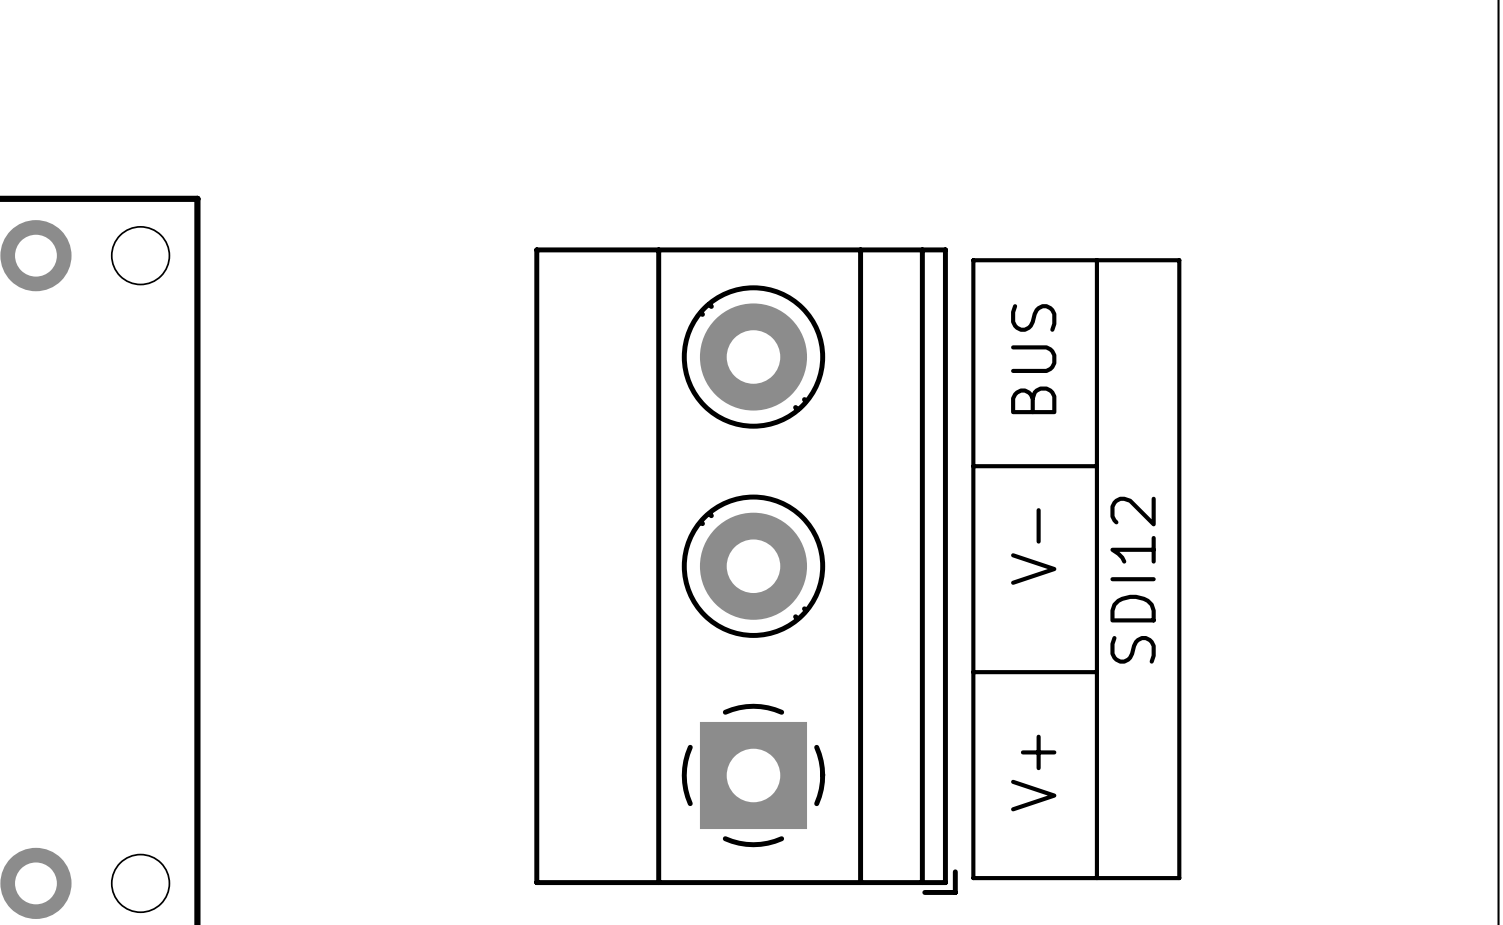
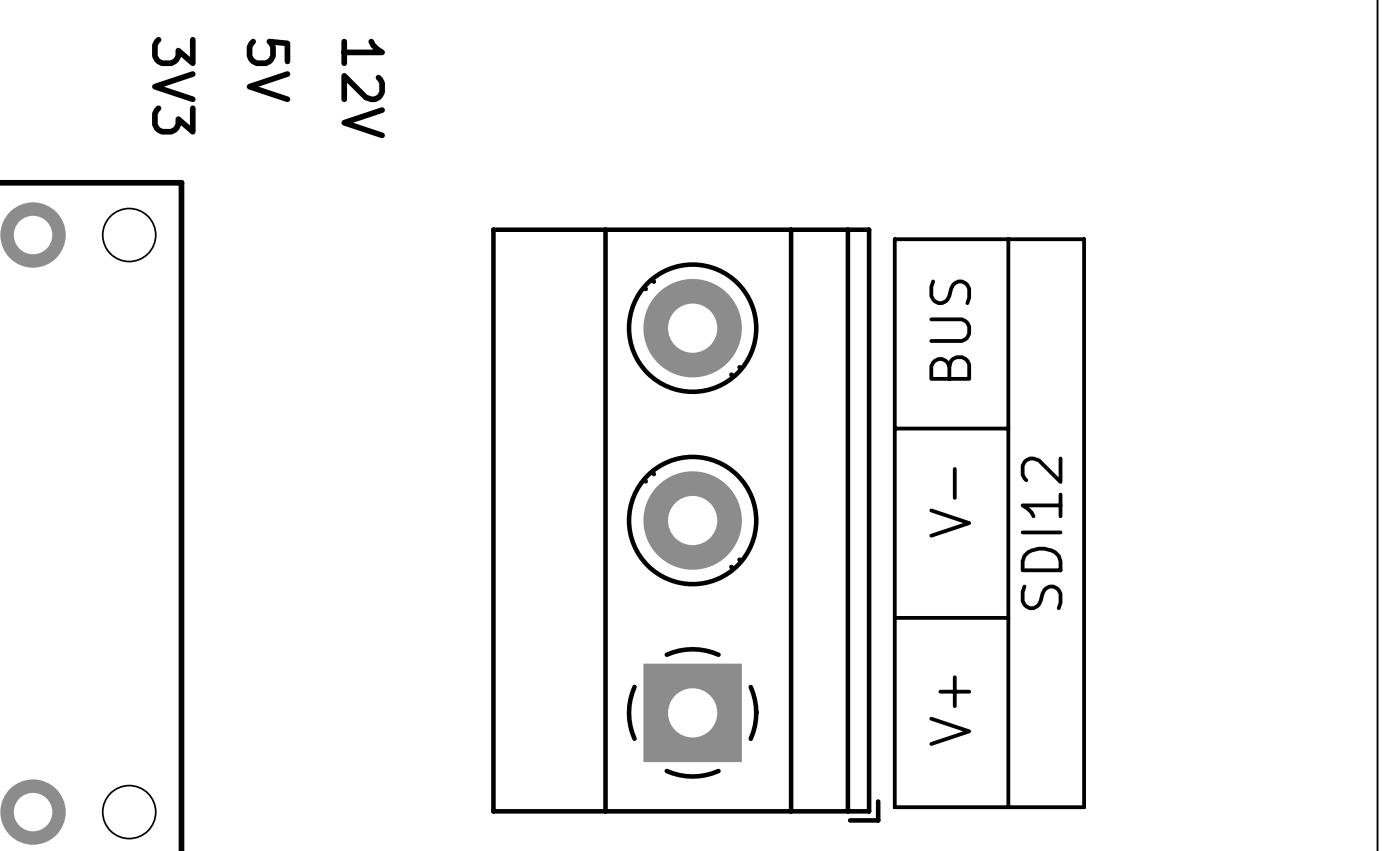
text: none -> 5V (268, 70)
text: none -> 3V3 (173, 85)
text: none -> 12V (363, 88)

